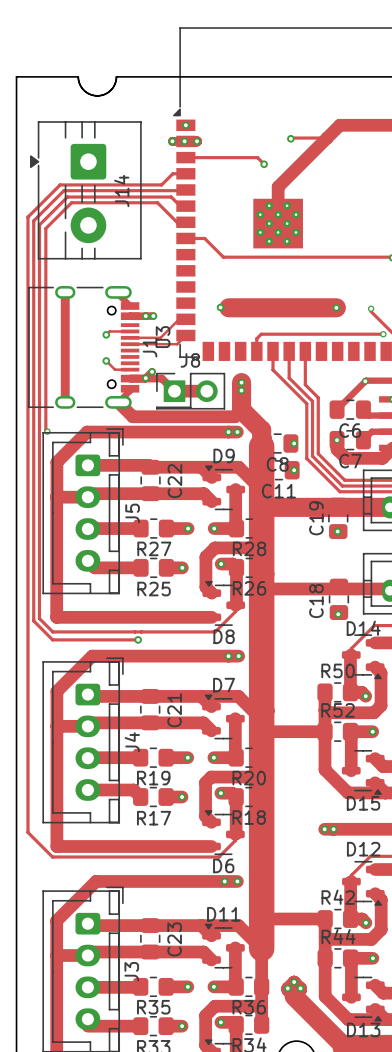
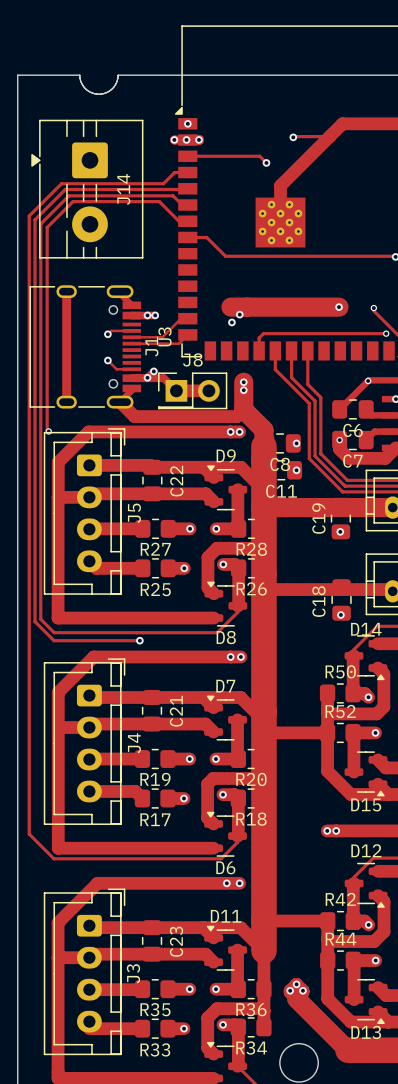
via: (220, 307) -> none
via: none -> (239, 314)
via: none -> (231, 322)

